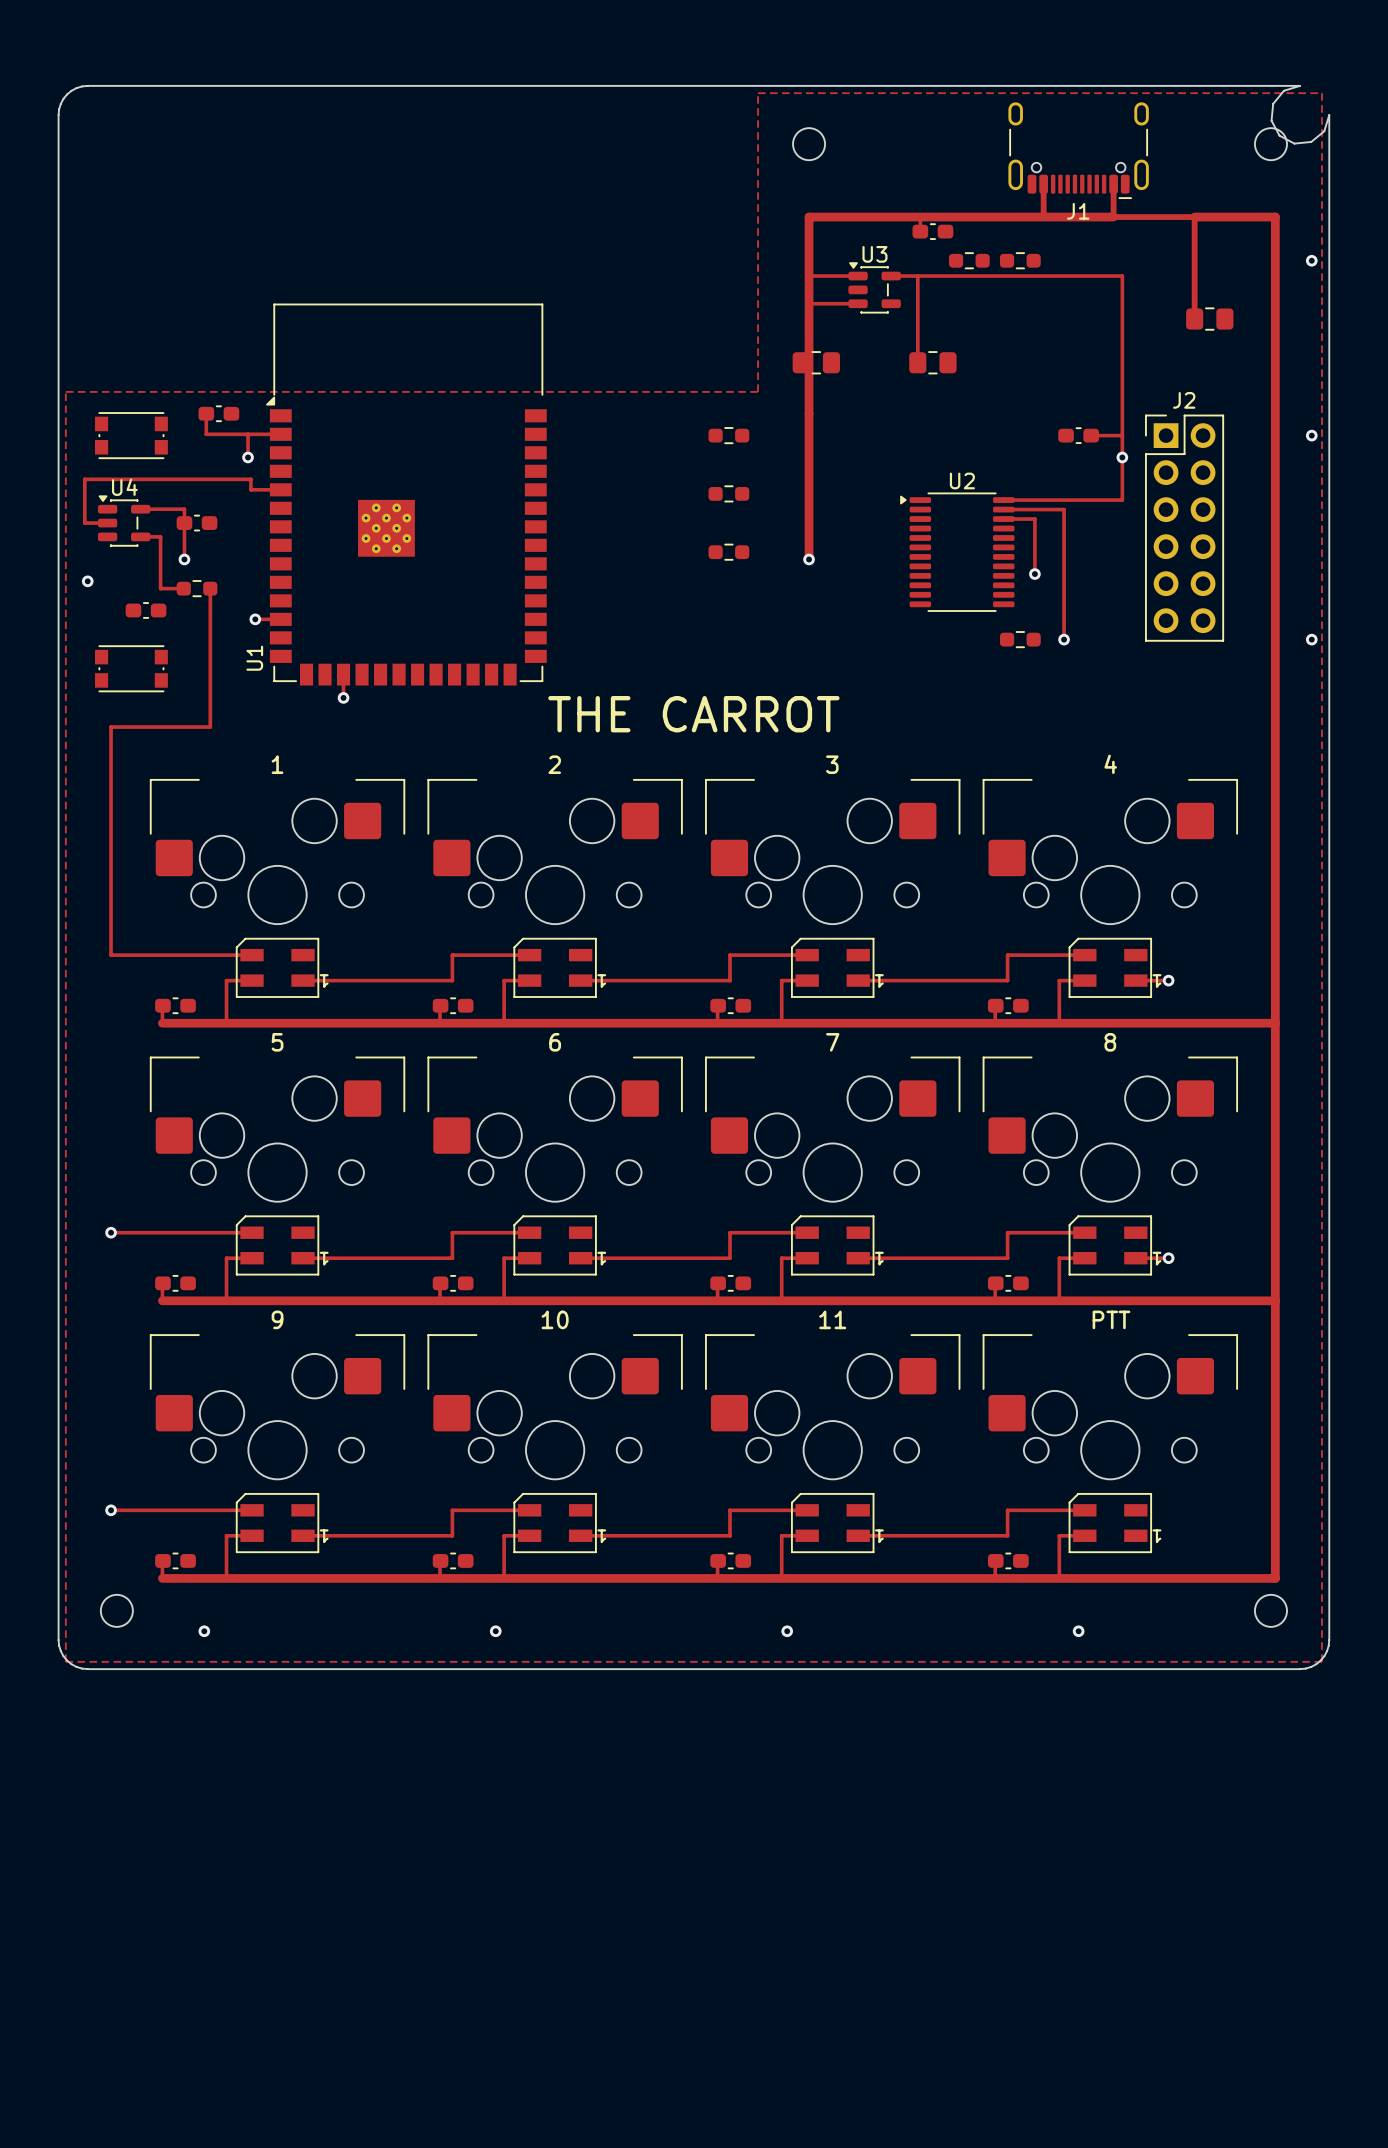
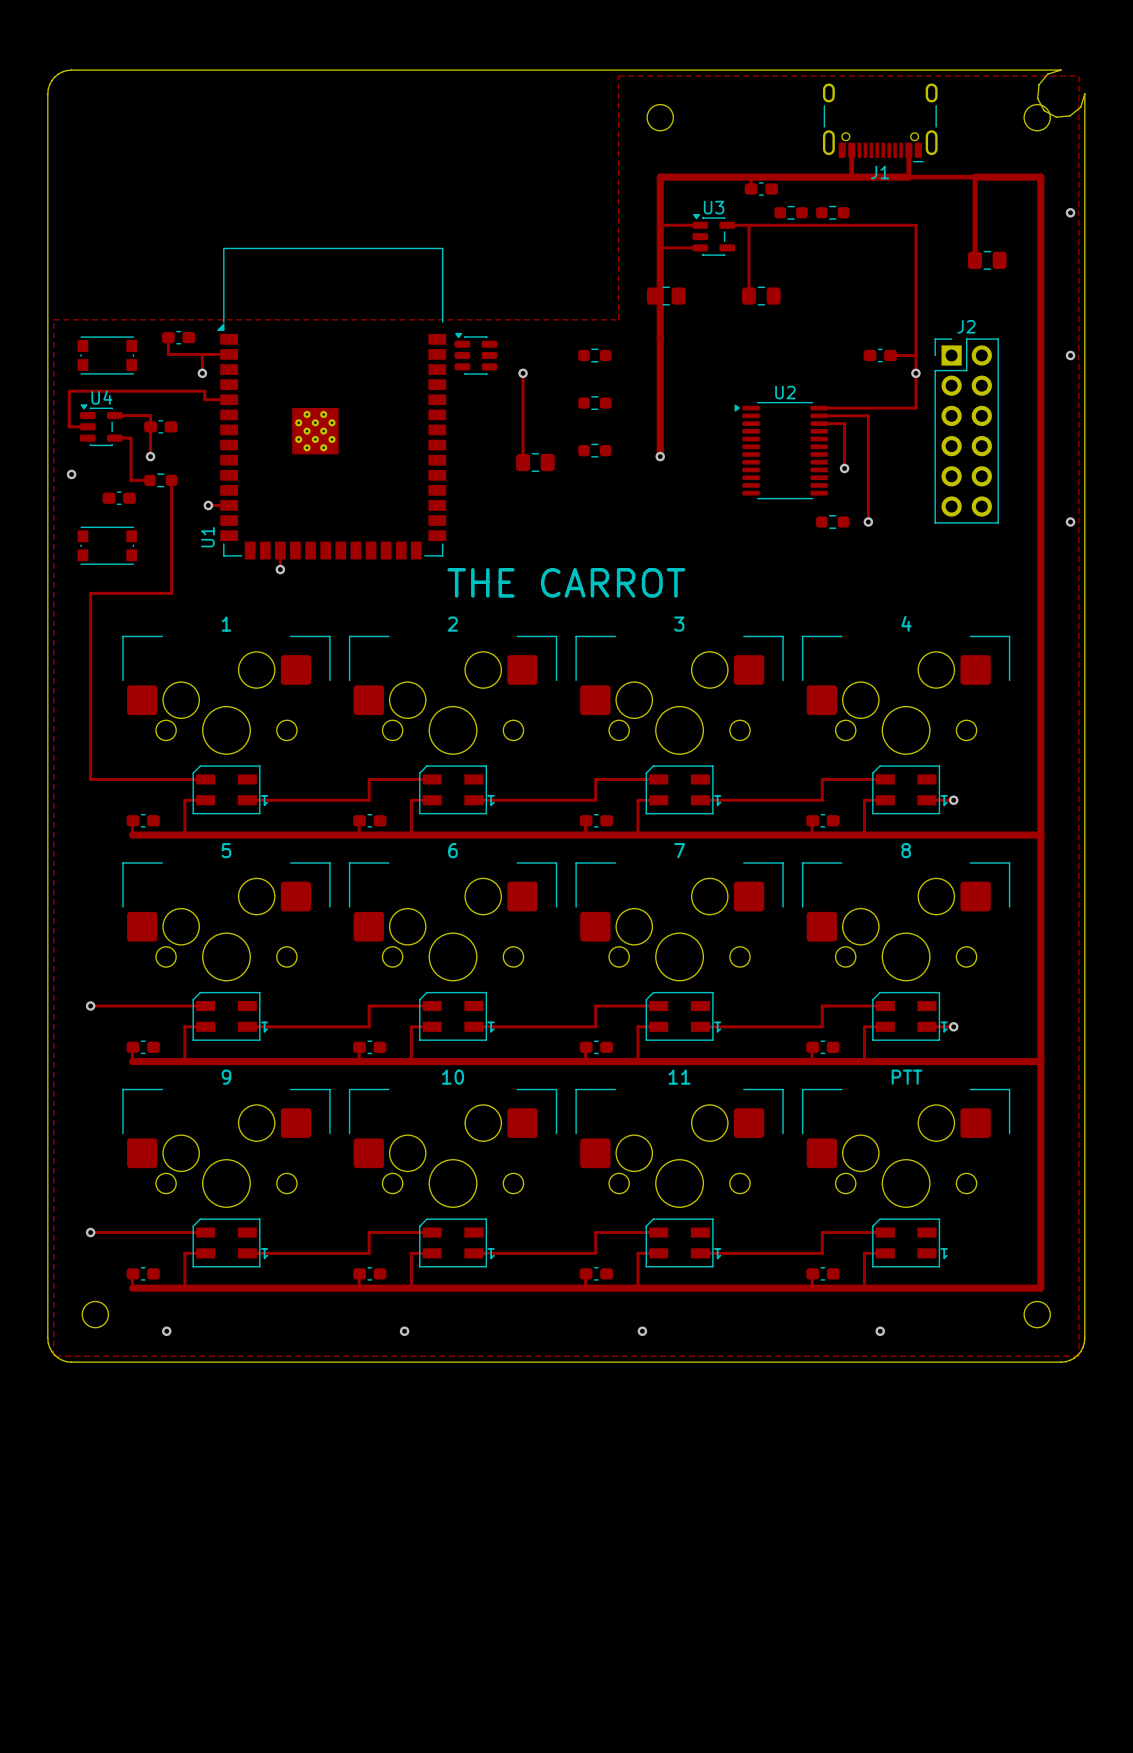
part: none -> (475, 353)
track: none -> (523, 373) (523, 462)
via: none -> (523, 373)
part: none -> (535, 462)

